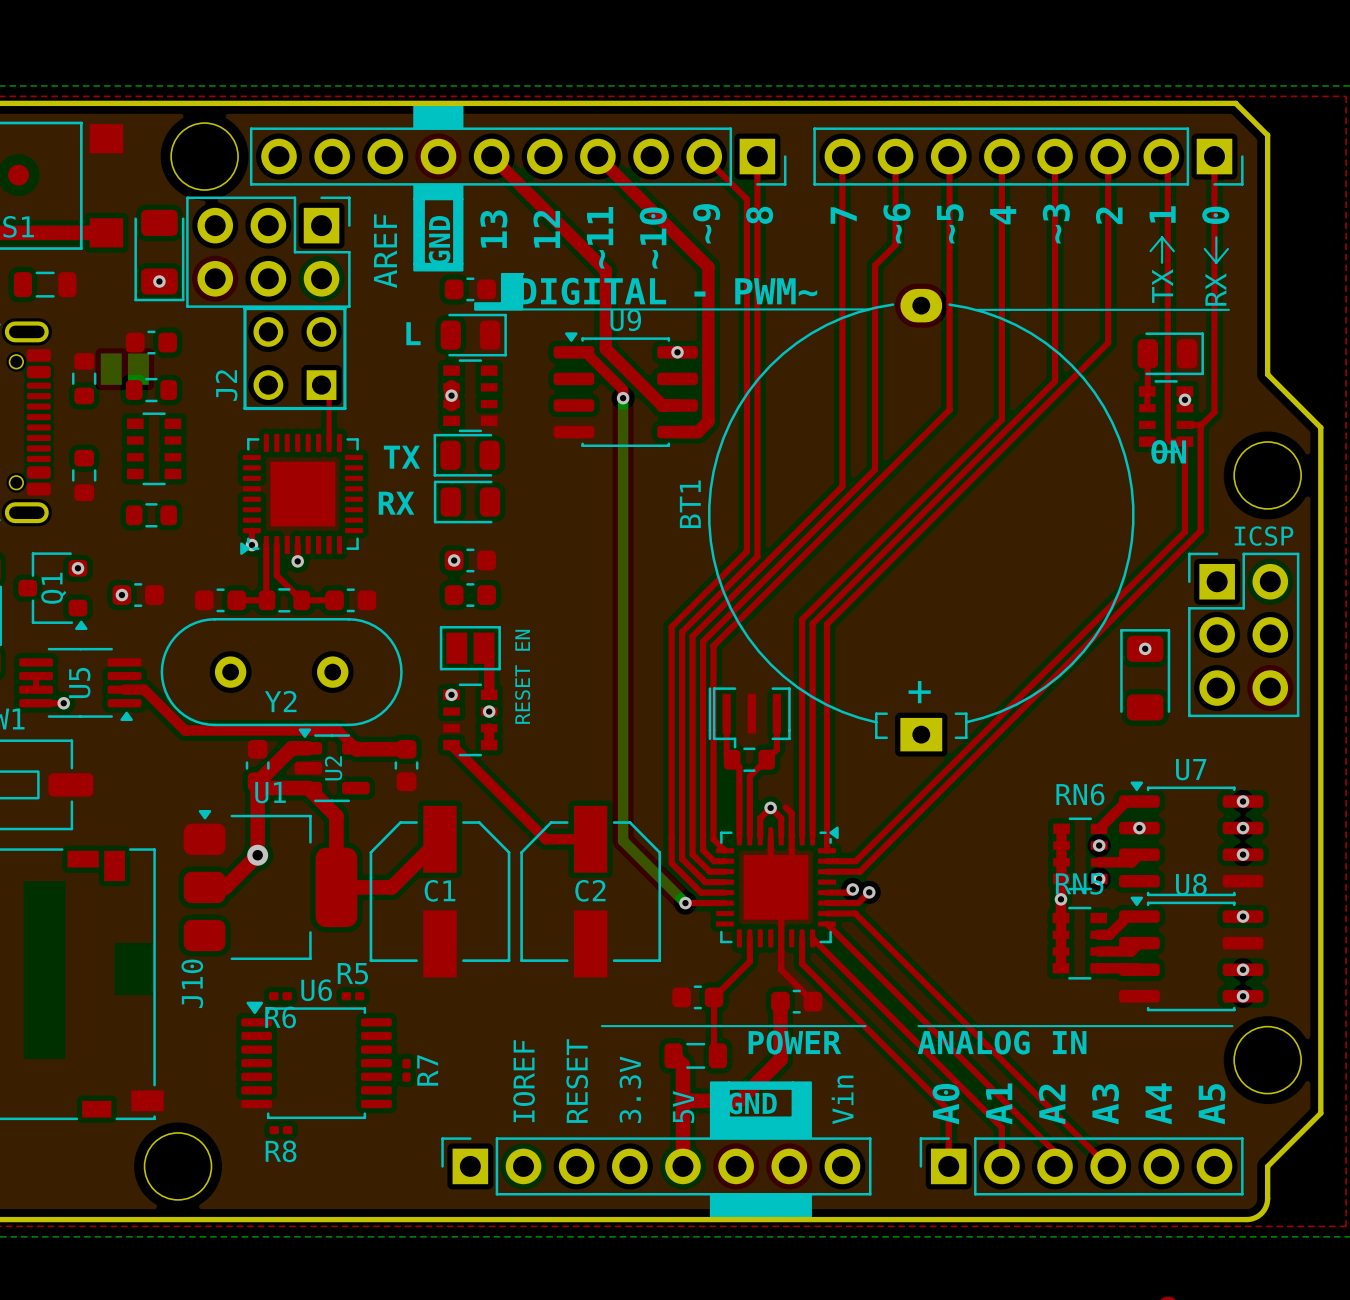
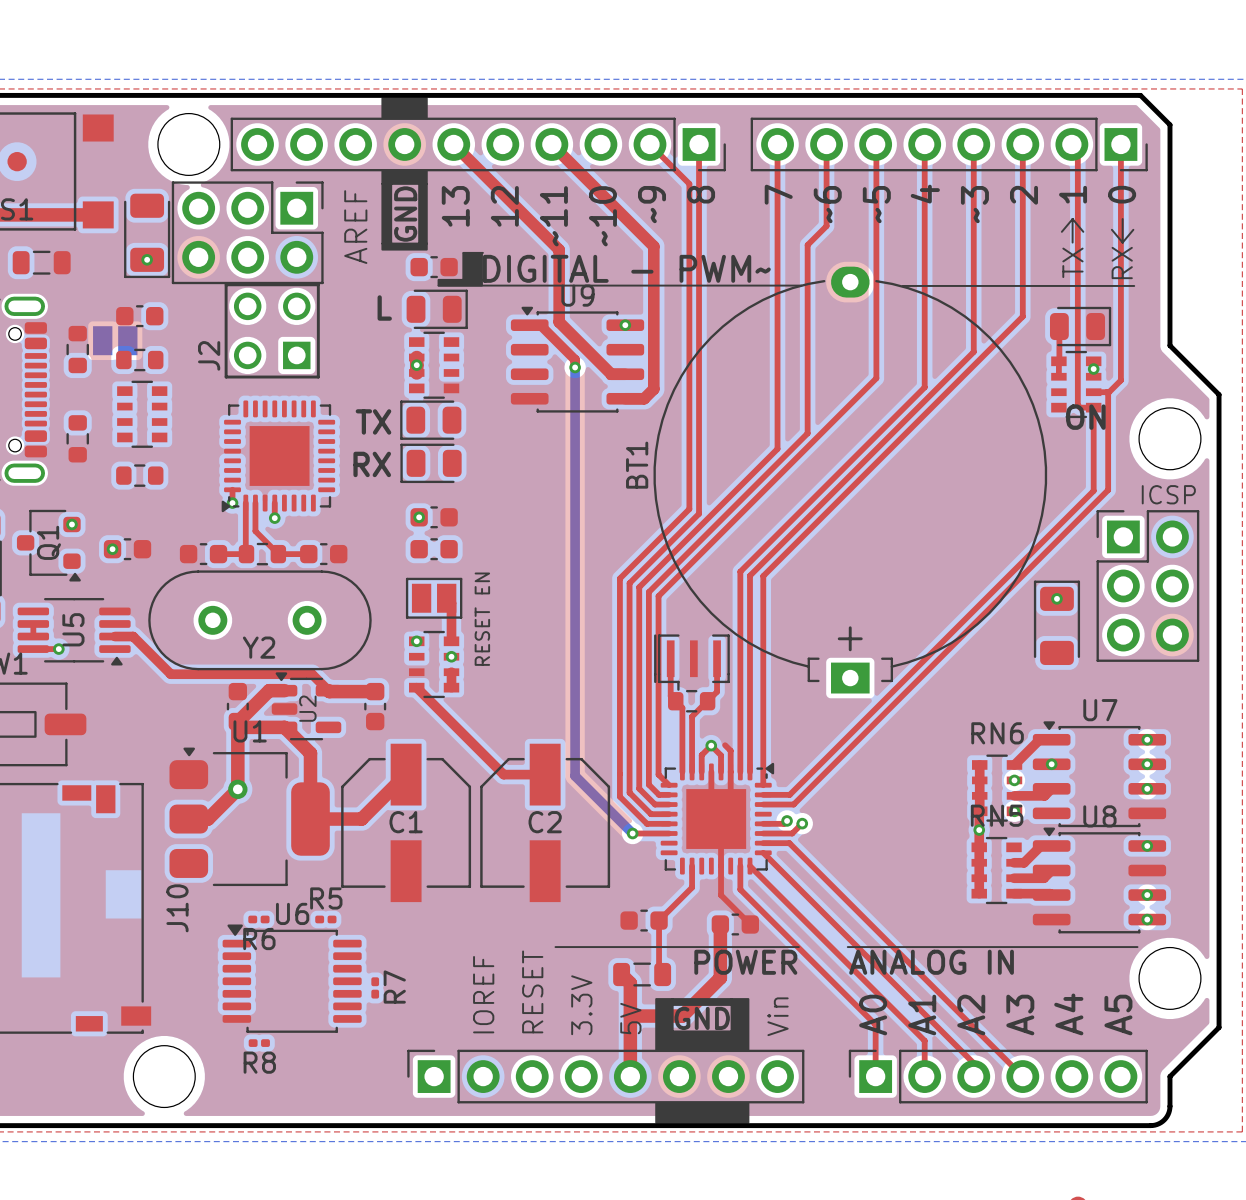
top track: (321, 385) (329, 392) (329, 443) -> none

